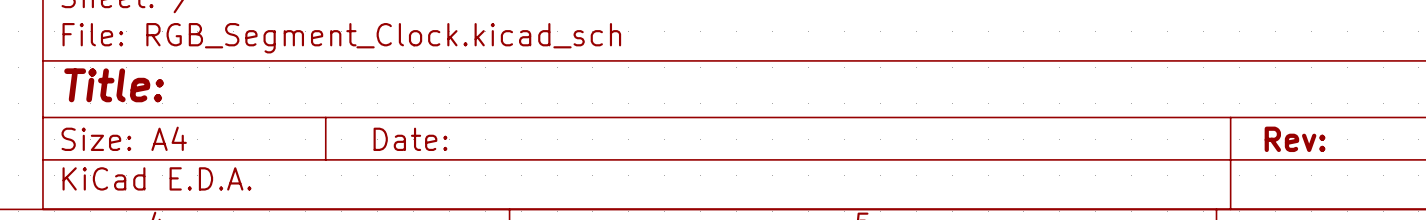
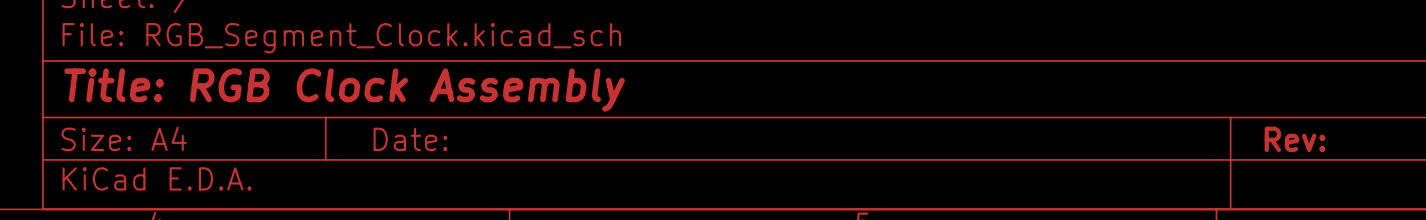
title block: Title: (114, 85) -> Title: RGB Clock Assembly (344, 90)

